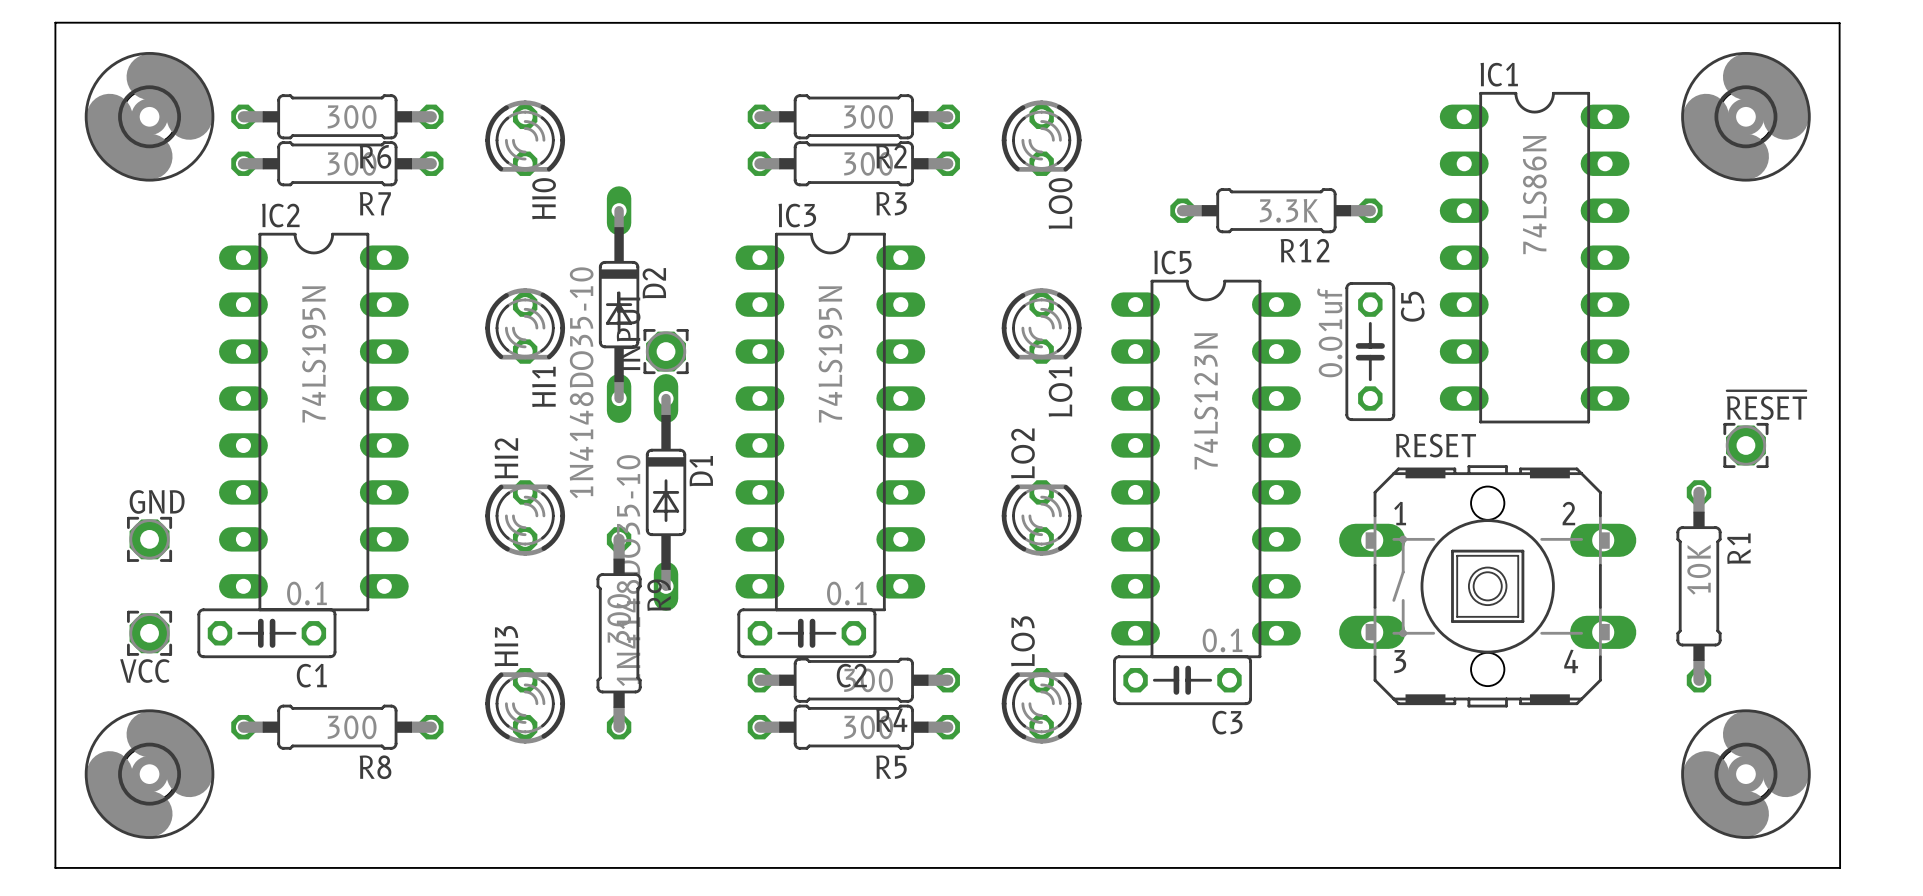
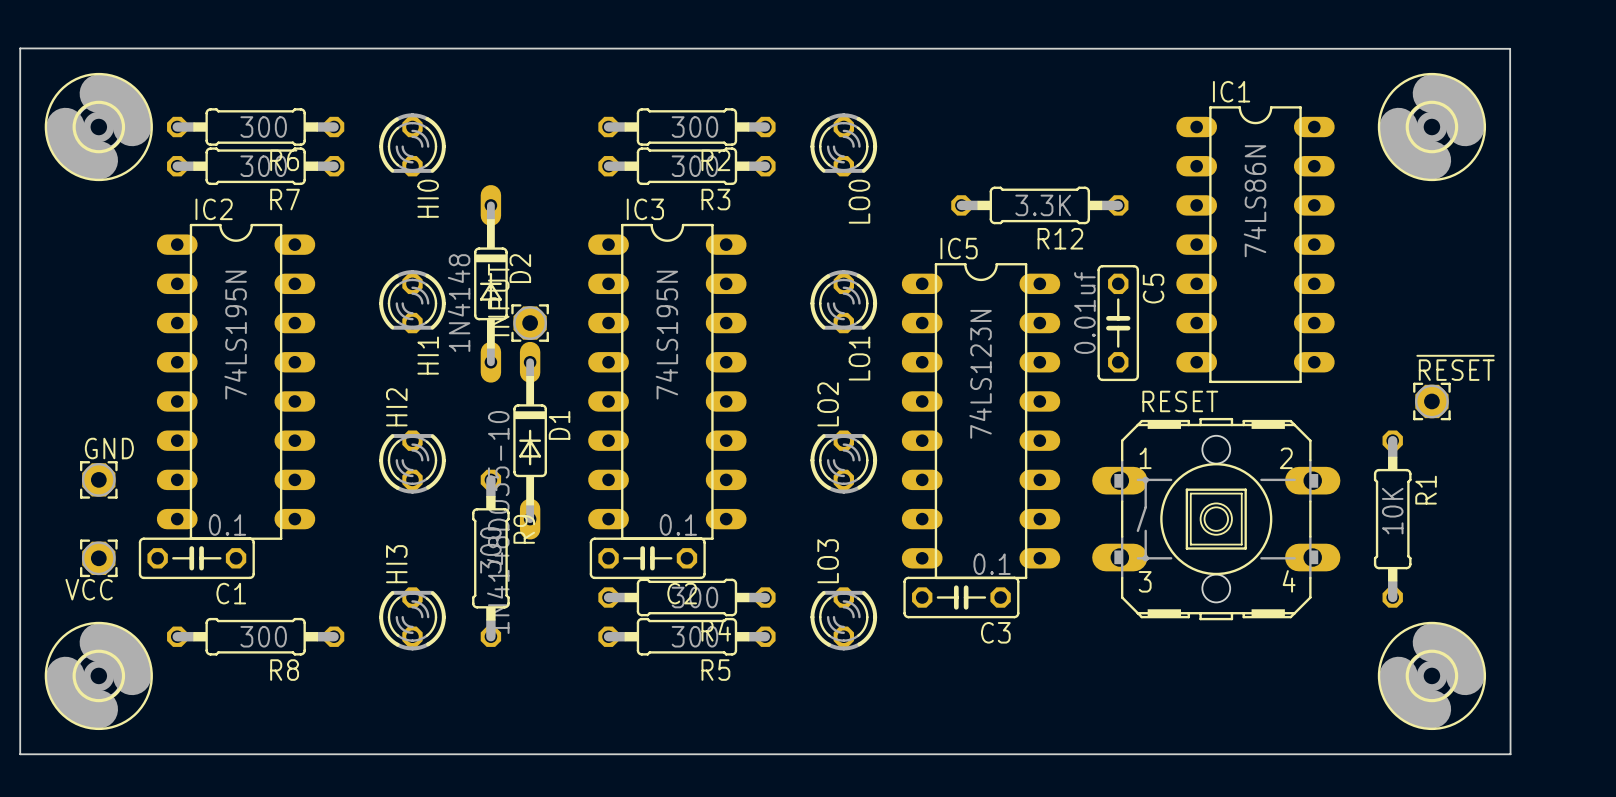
D2 value: 1N4148DO35-10 (581, 382) -> 1N4148 (459, 303)

